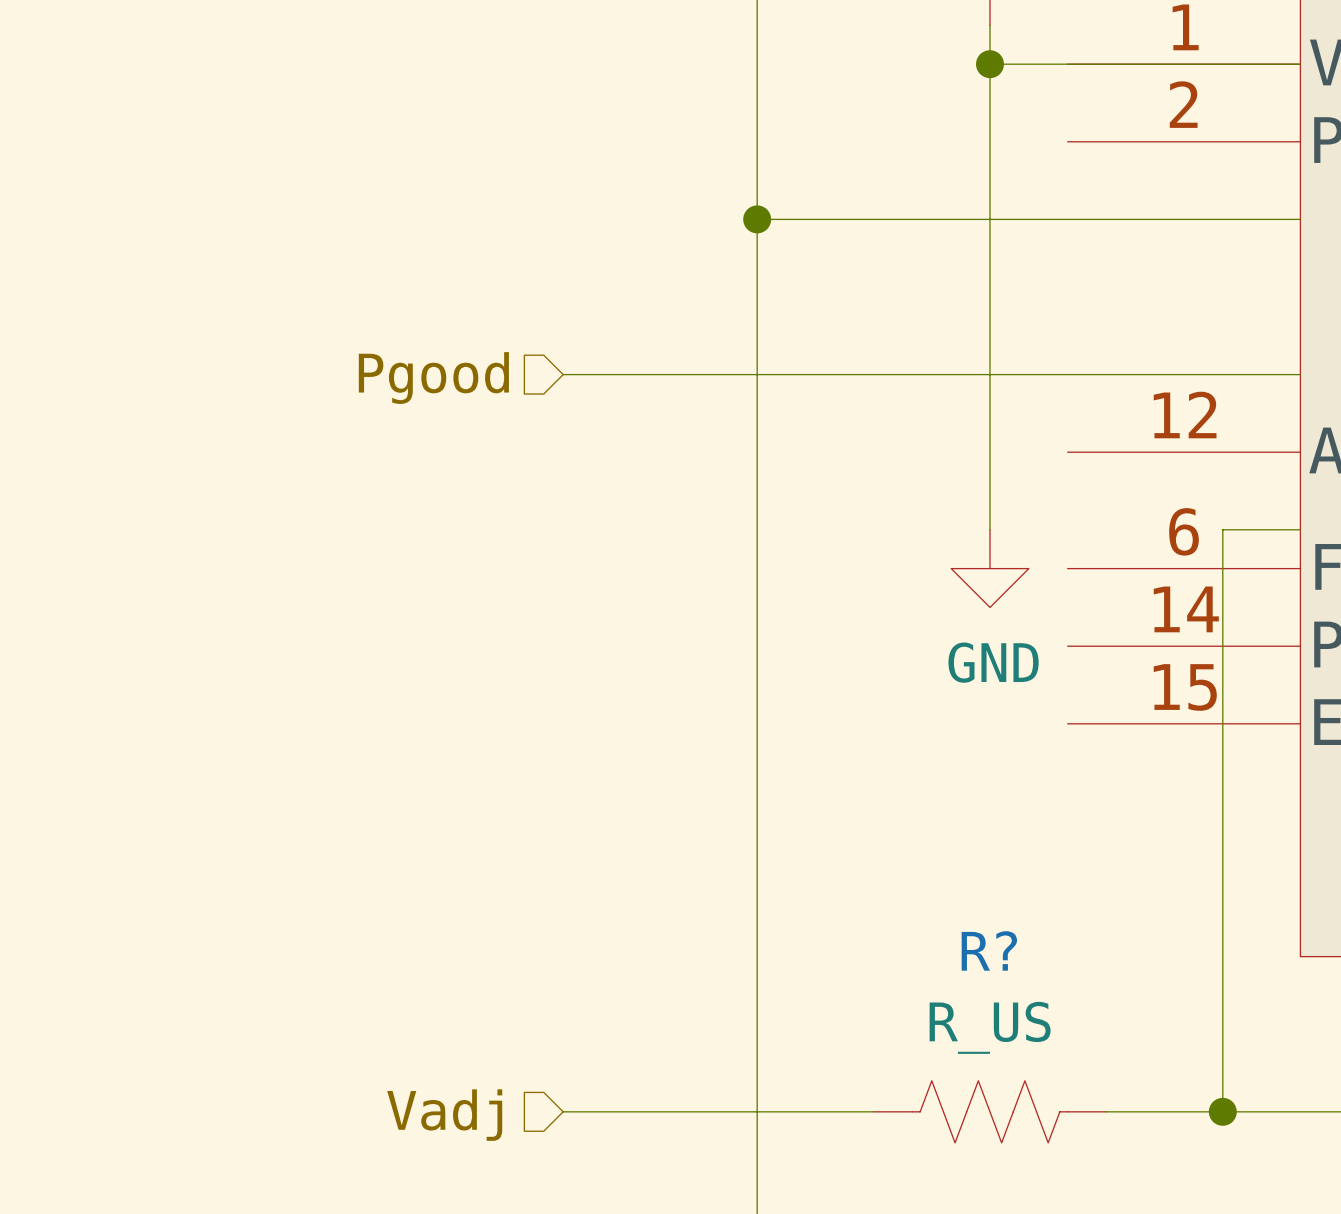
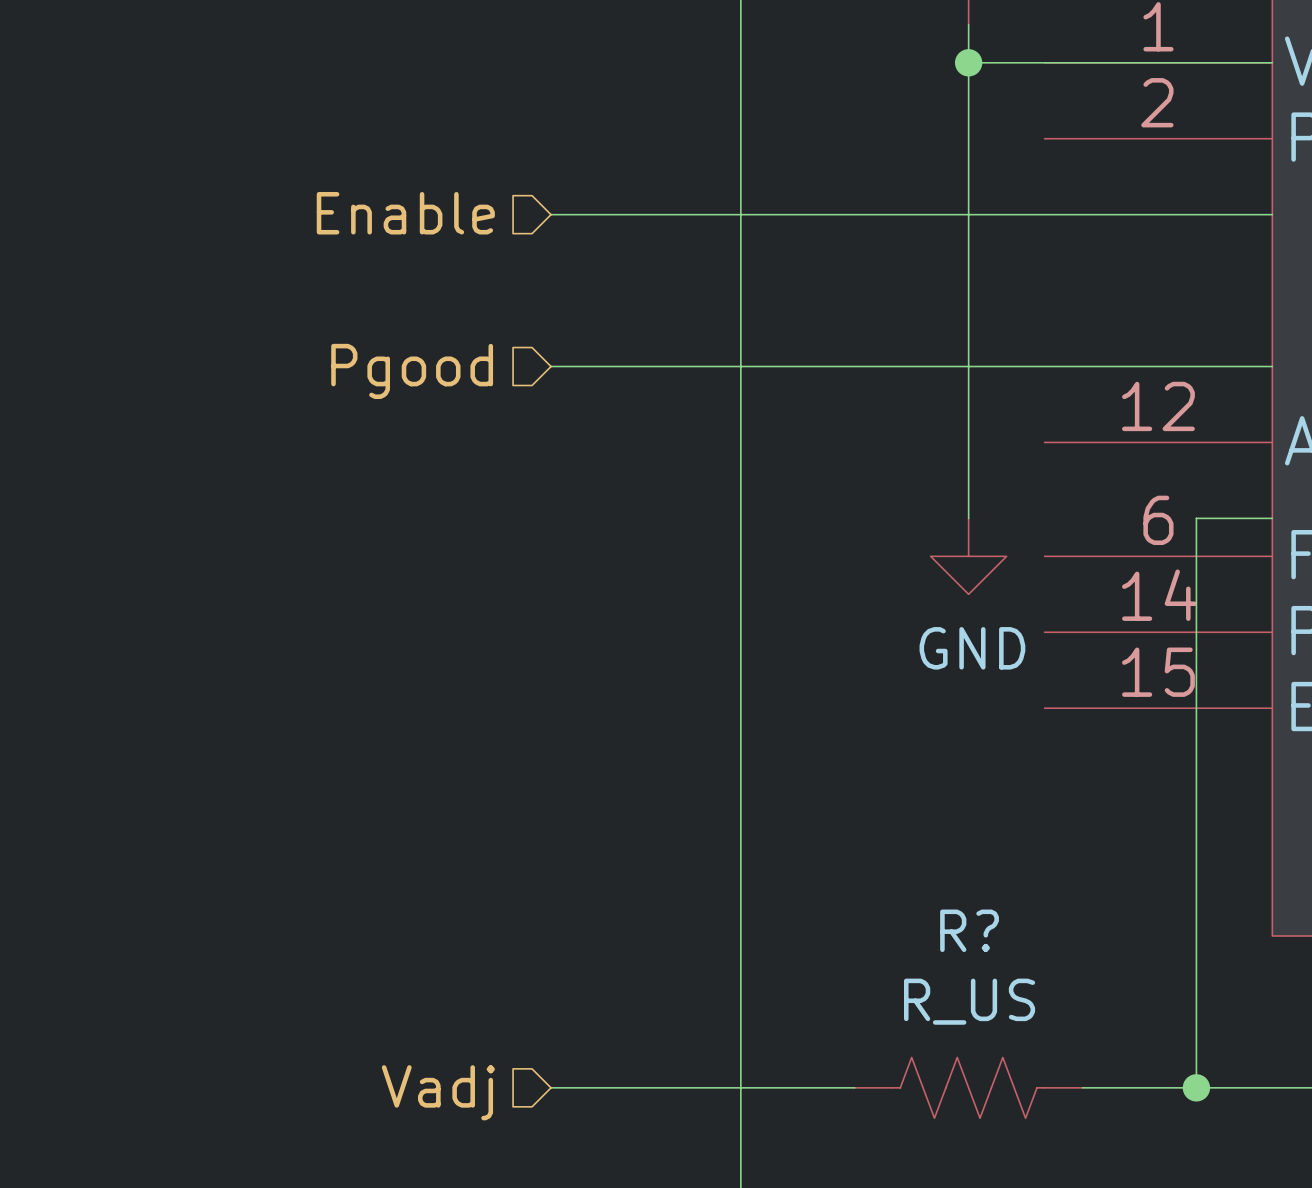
hierarchical label: none -> Enable (405, 213)
wire: none -> (551, 214) (740, 214)
junction: (757, 219) -> none

